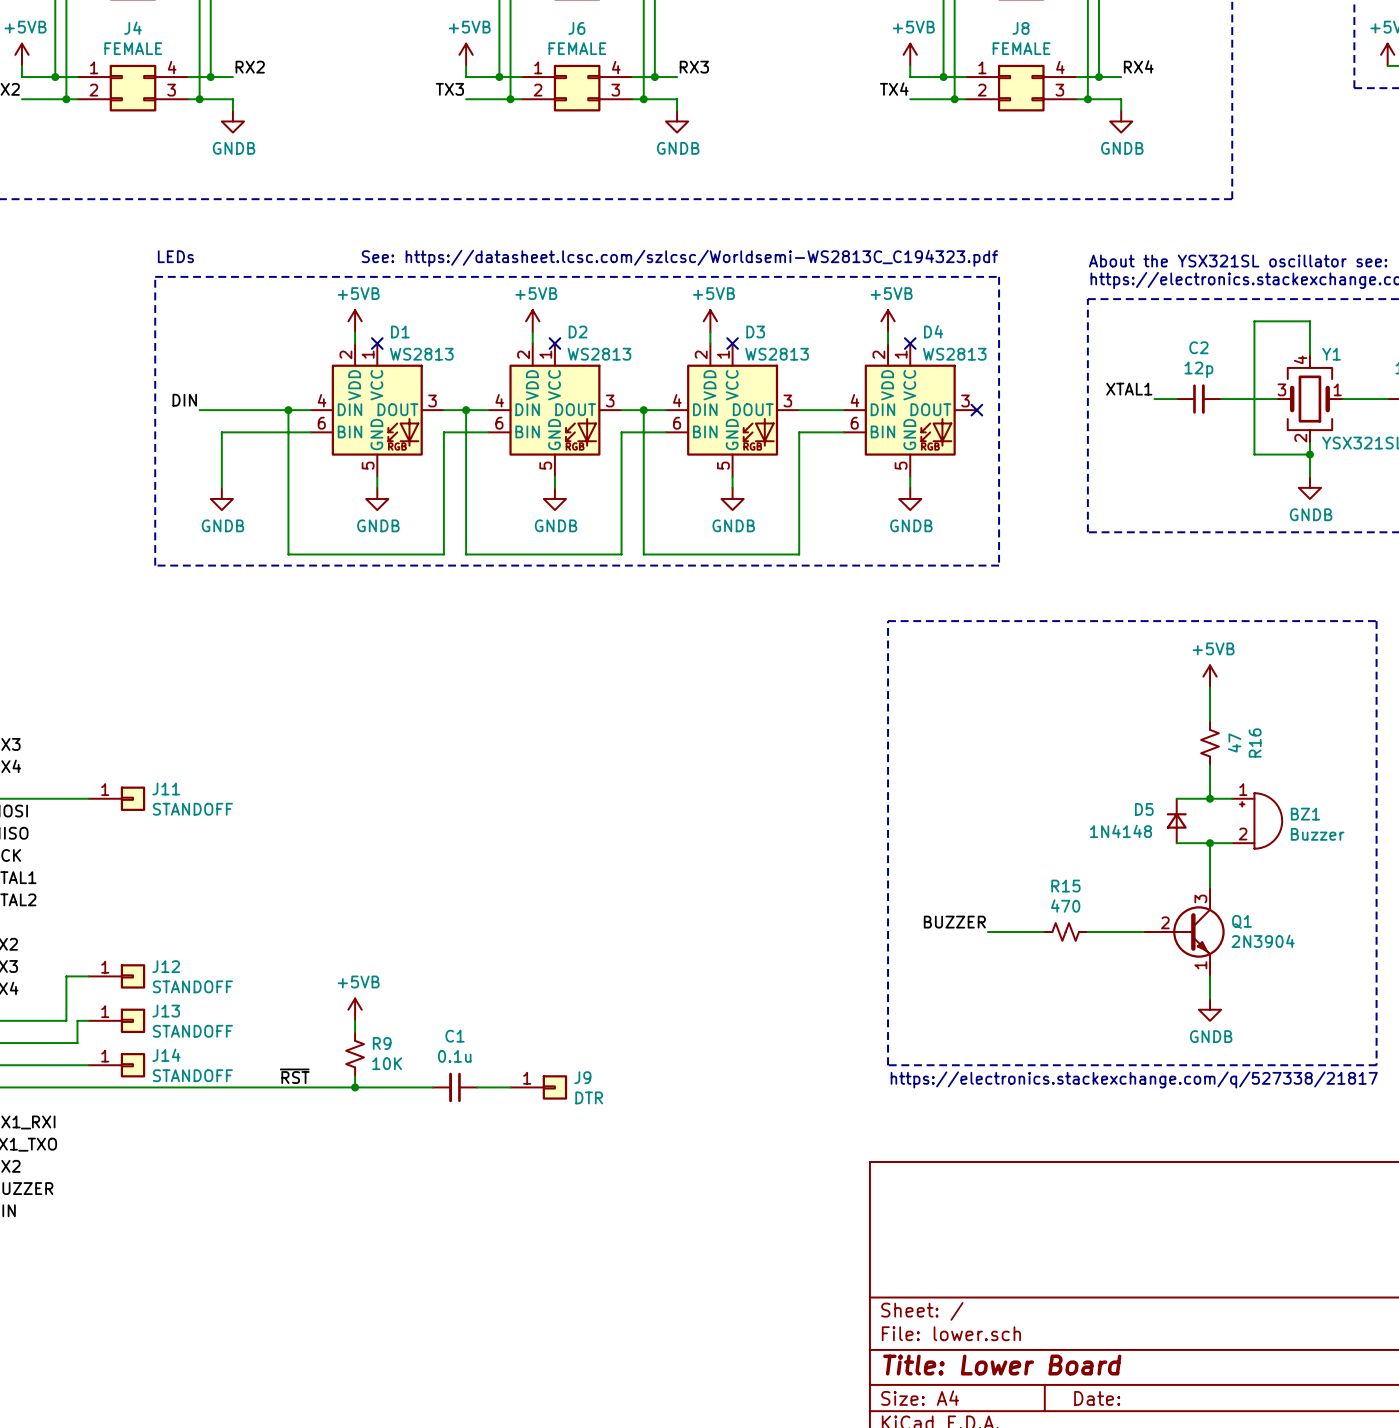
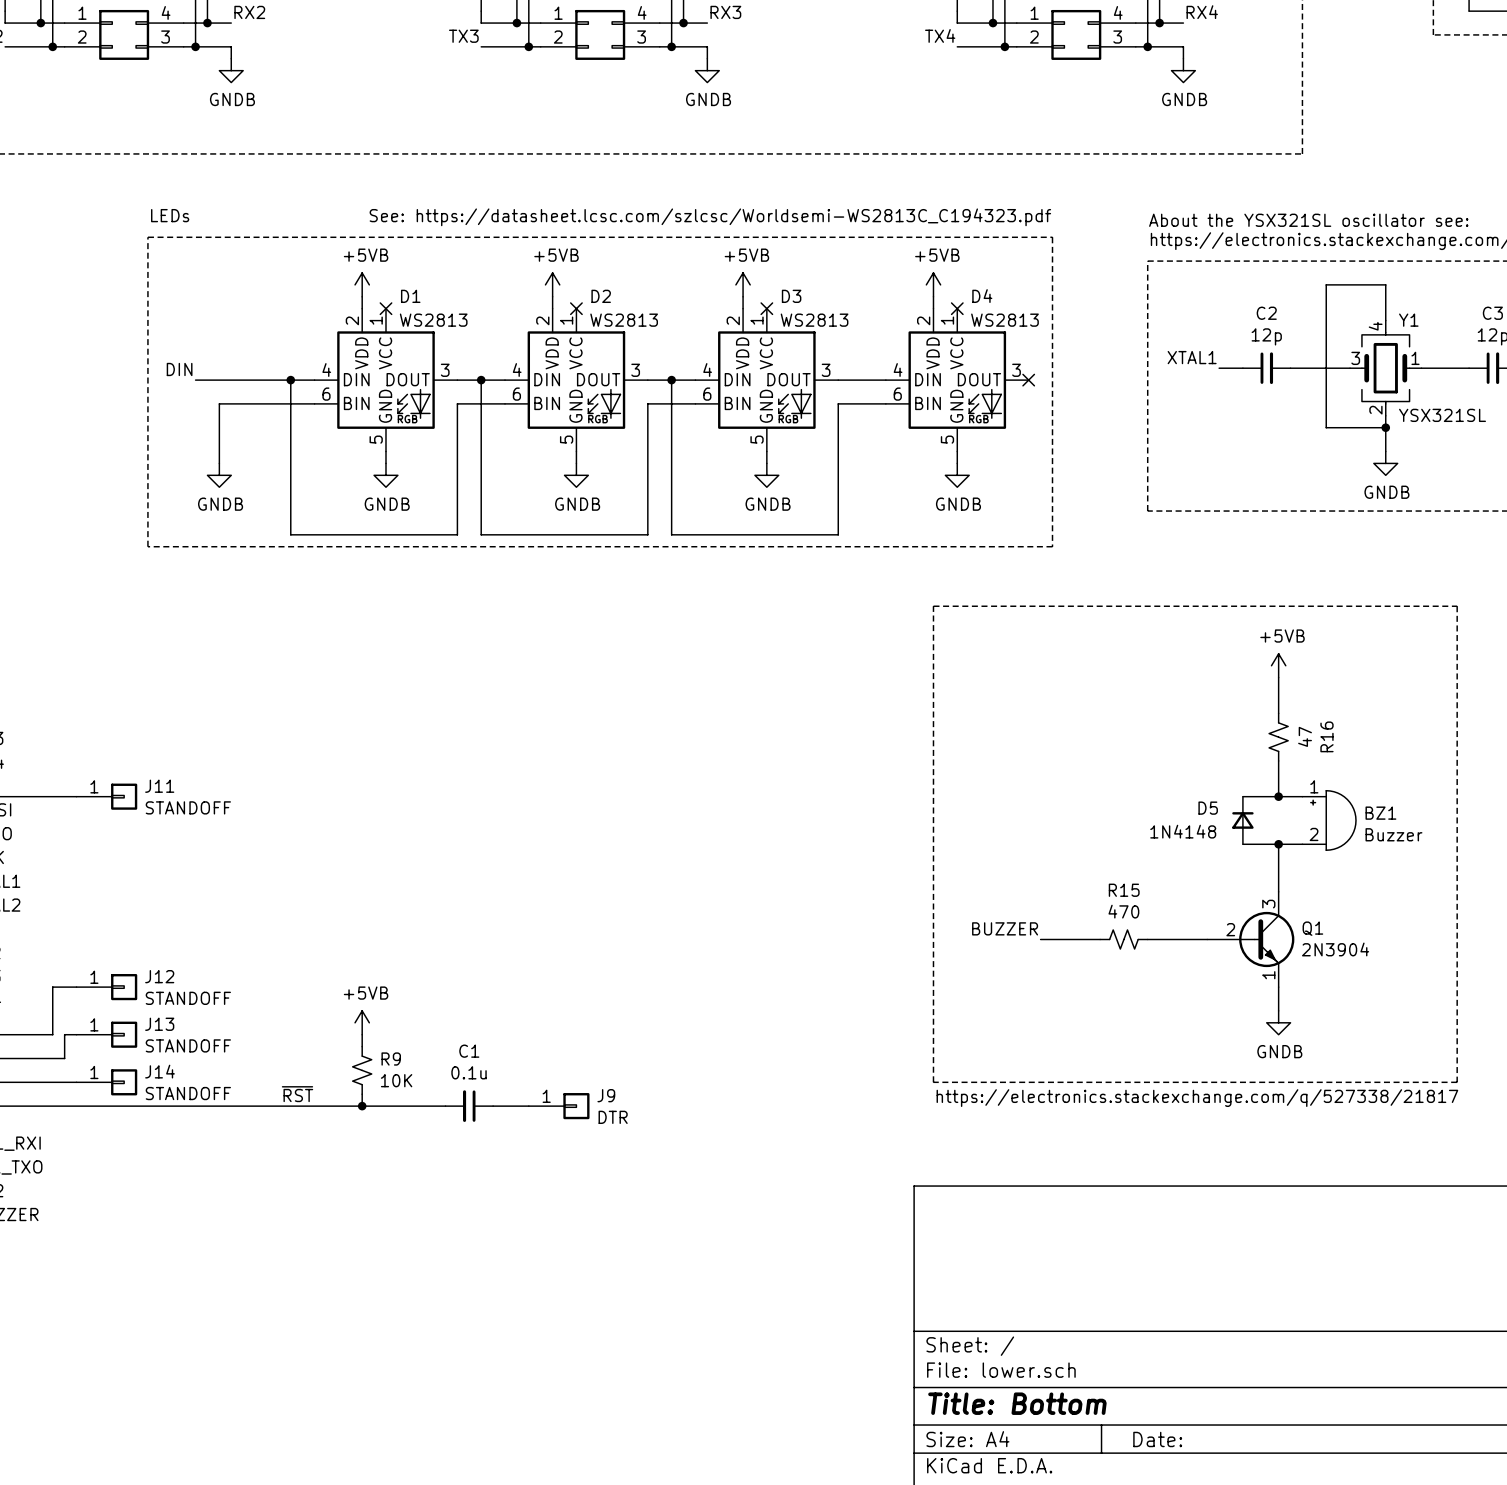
title block: Title: Lower Board (1002, 1365) -> Title: Bottom (1017, 1403)

